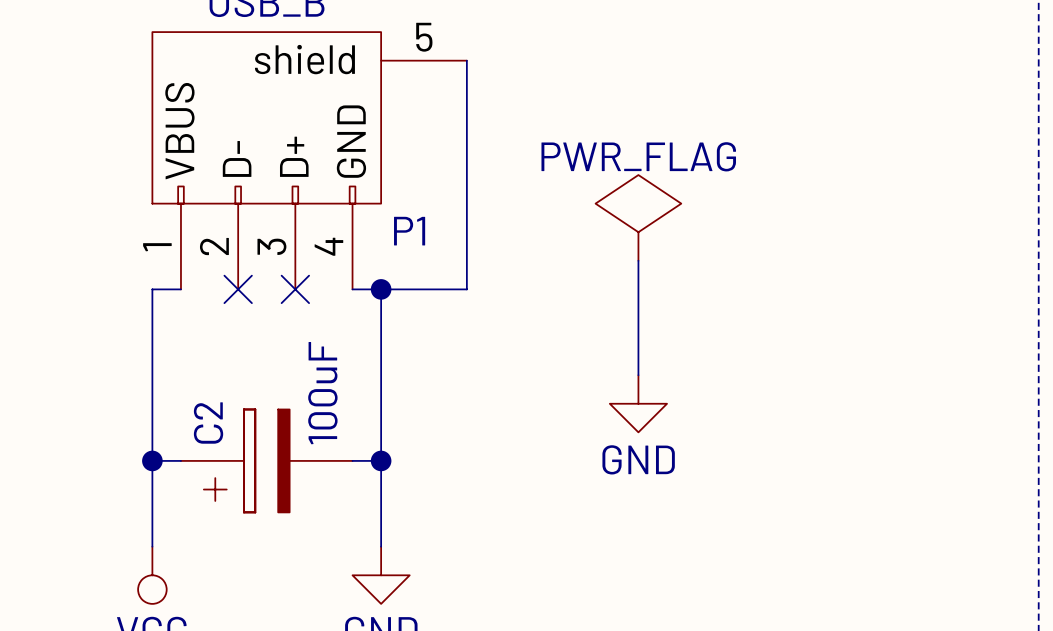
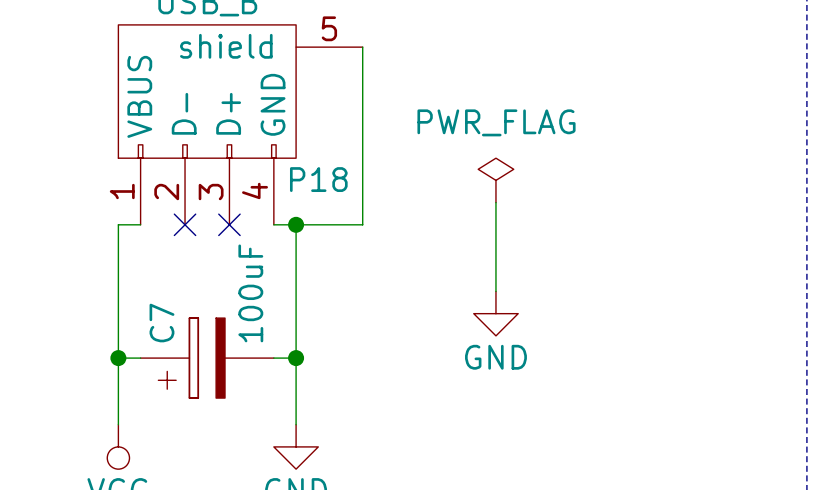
power symbol shape: [595, 175, 682, 261] -> [478, 158, 514, 203]
P1 name: P1 (409, 231) -> P18 (318, 179)
C2 name: C2 (208, 423) -> C7 (161, 323)

